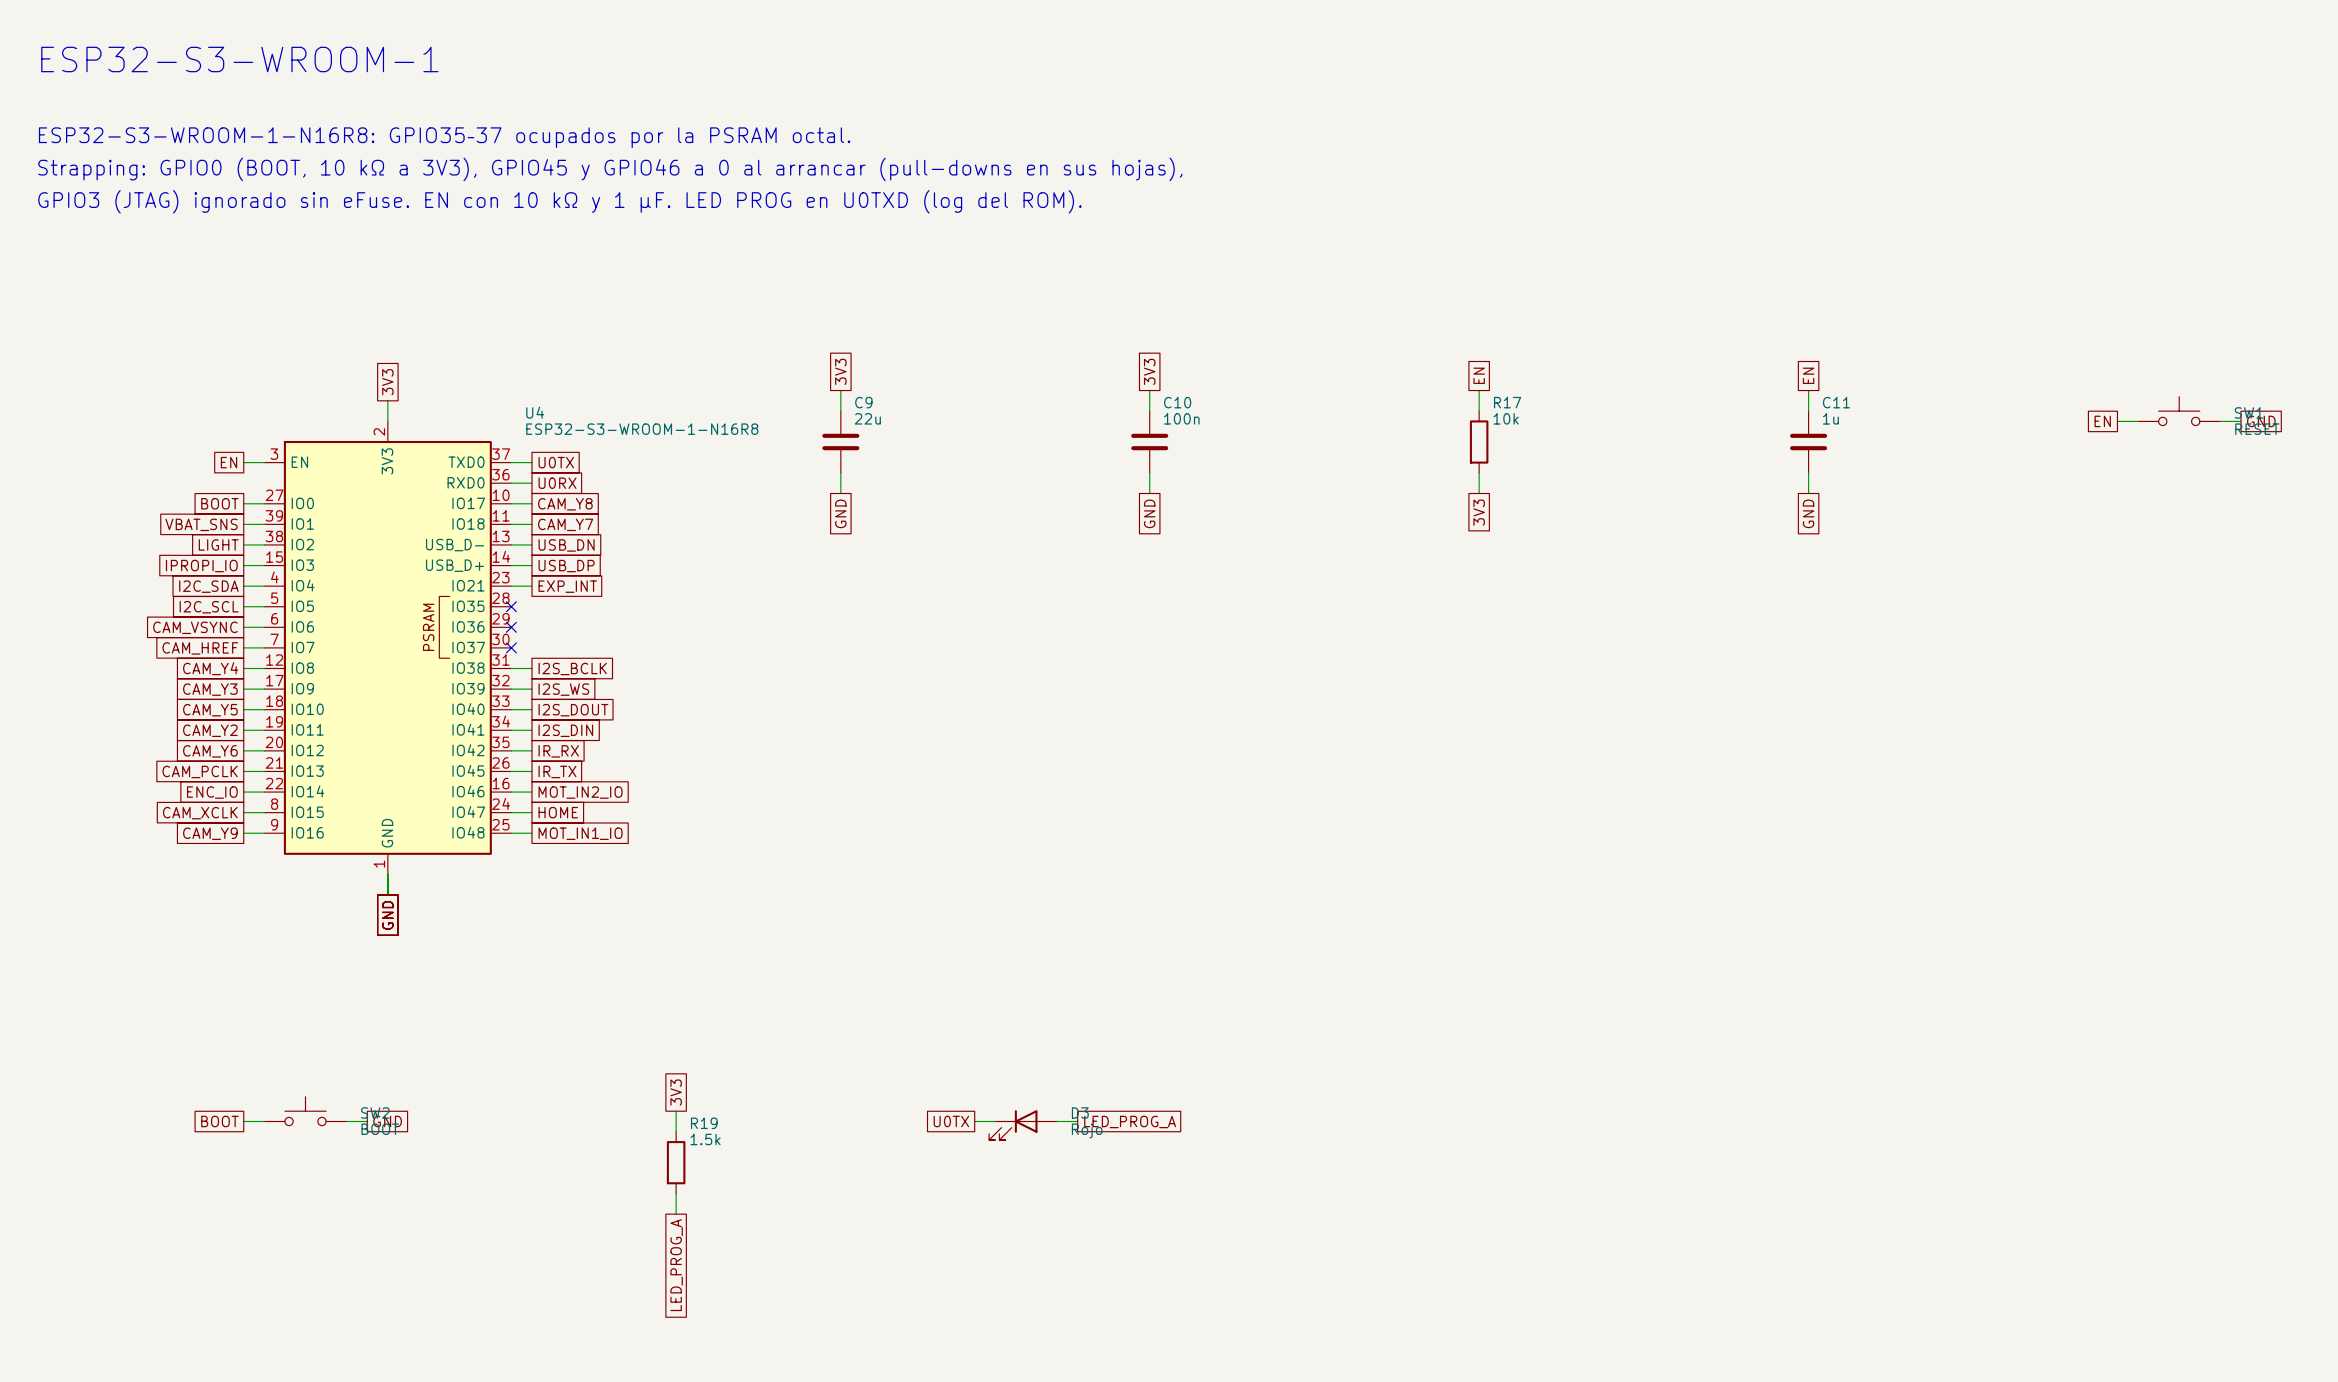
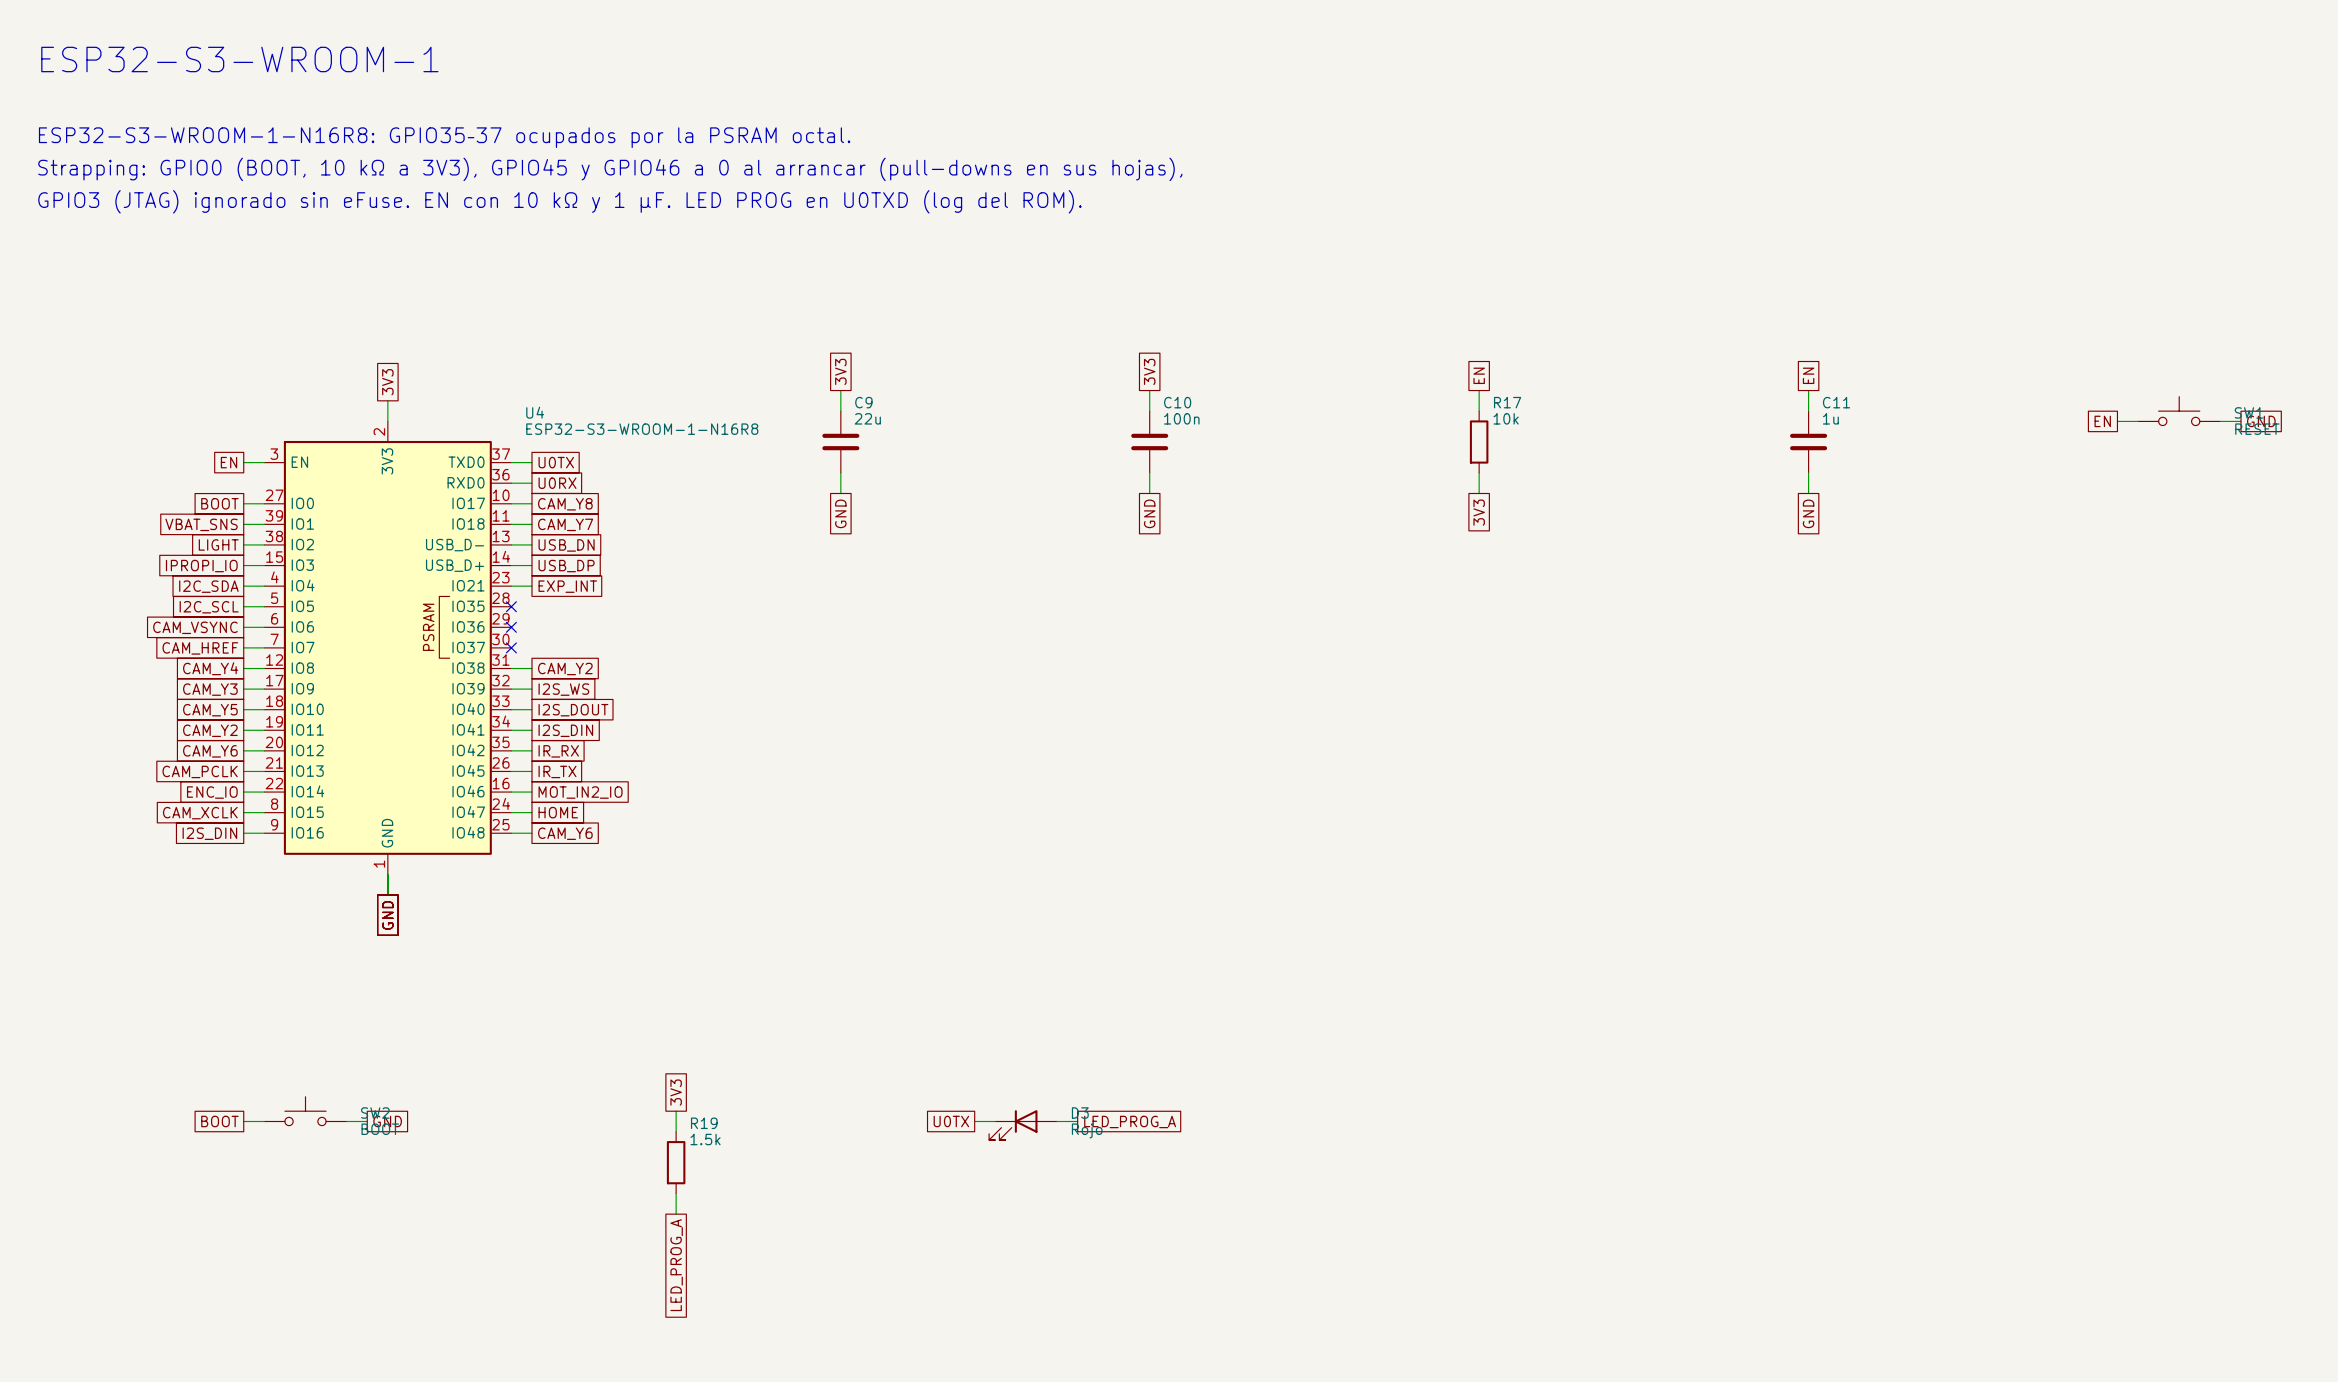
global label: I2S_BCLK (572, 668) -> CAM_Y2 (565, 668)
global label: CAM_Y9 (210, 833) -> I2S_DIN (209, 833)
global label: MOT_IN1_IO (580, 833) -> CAM_Y6 (565, 833)

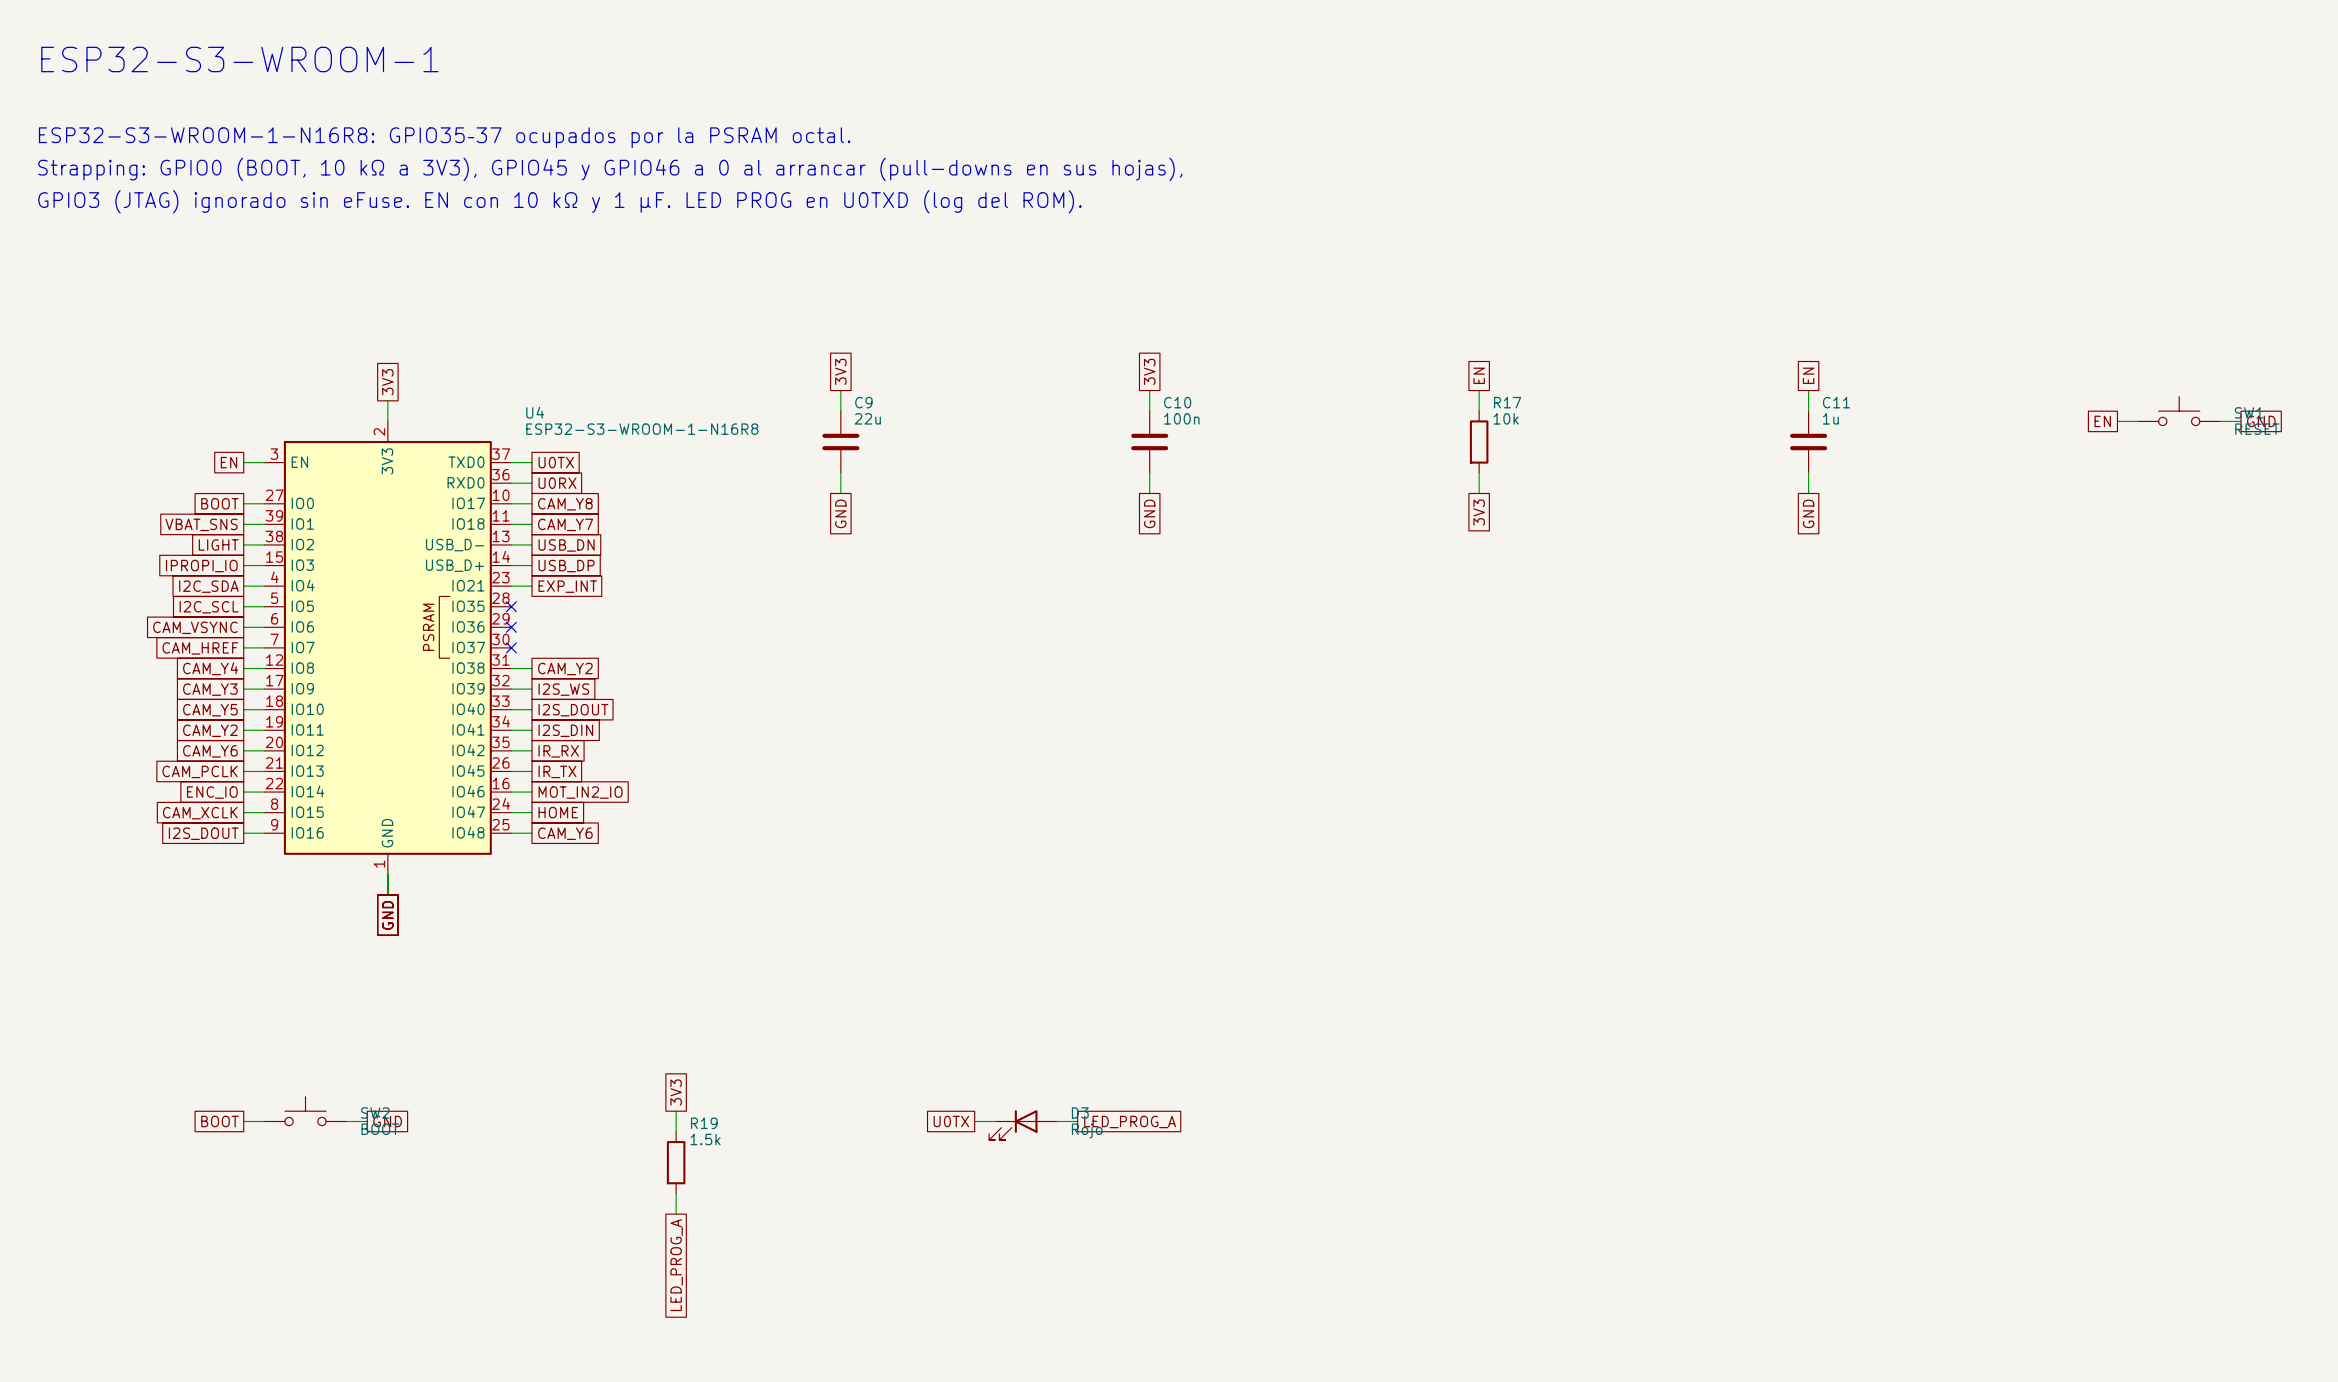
global label: I2S_DIN (209, 833) -> I2S_DOUT (203, 833)

